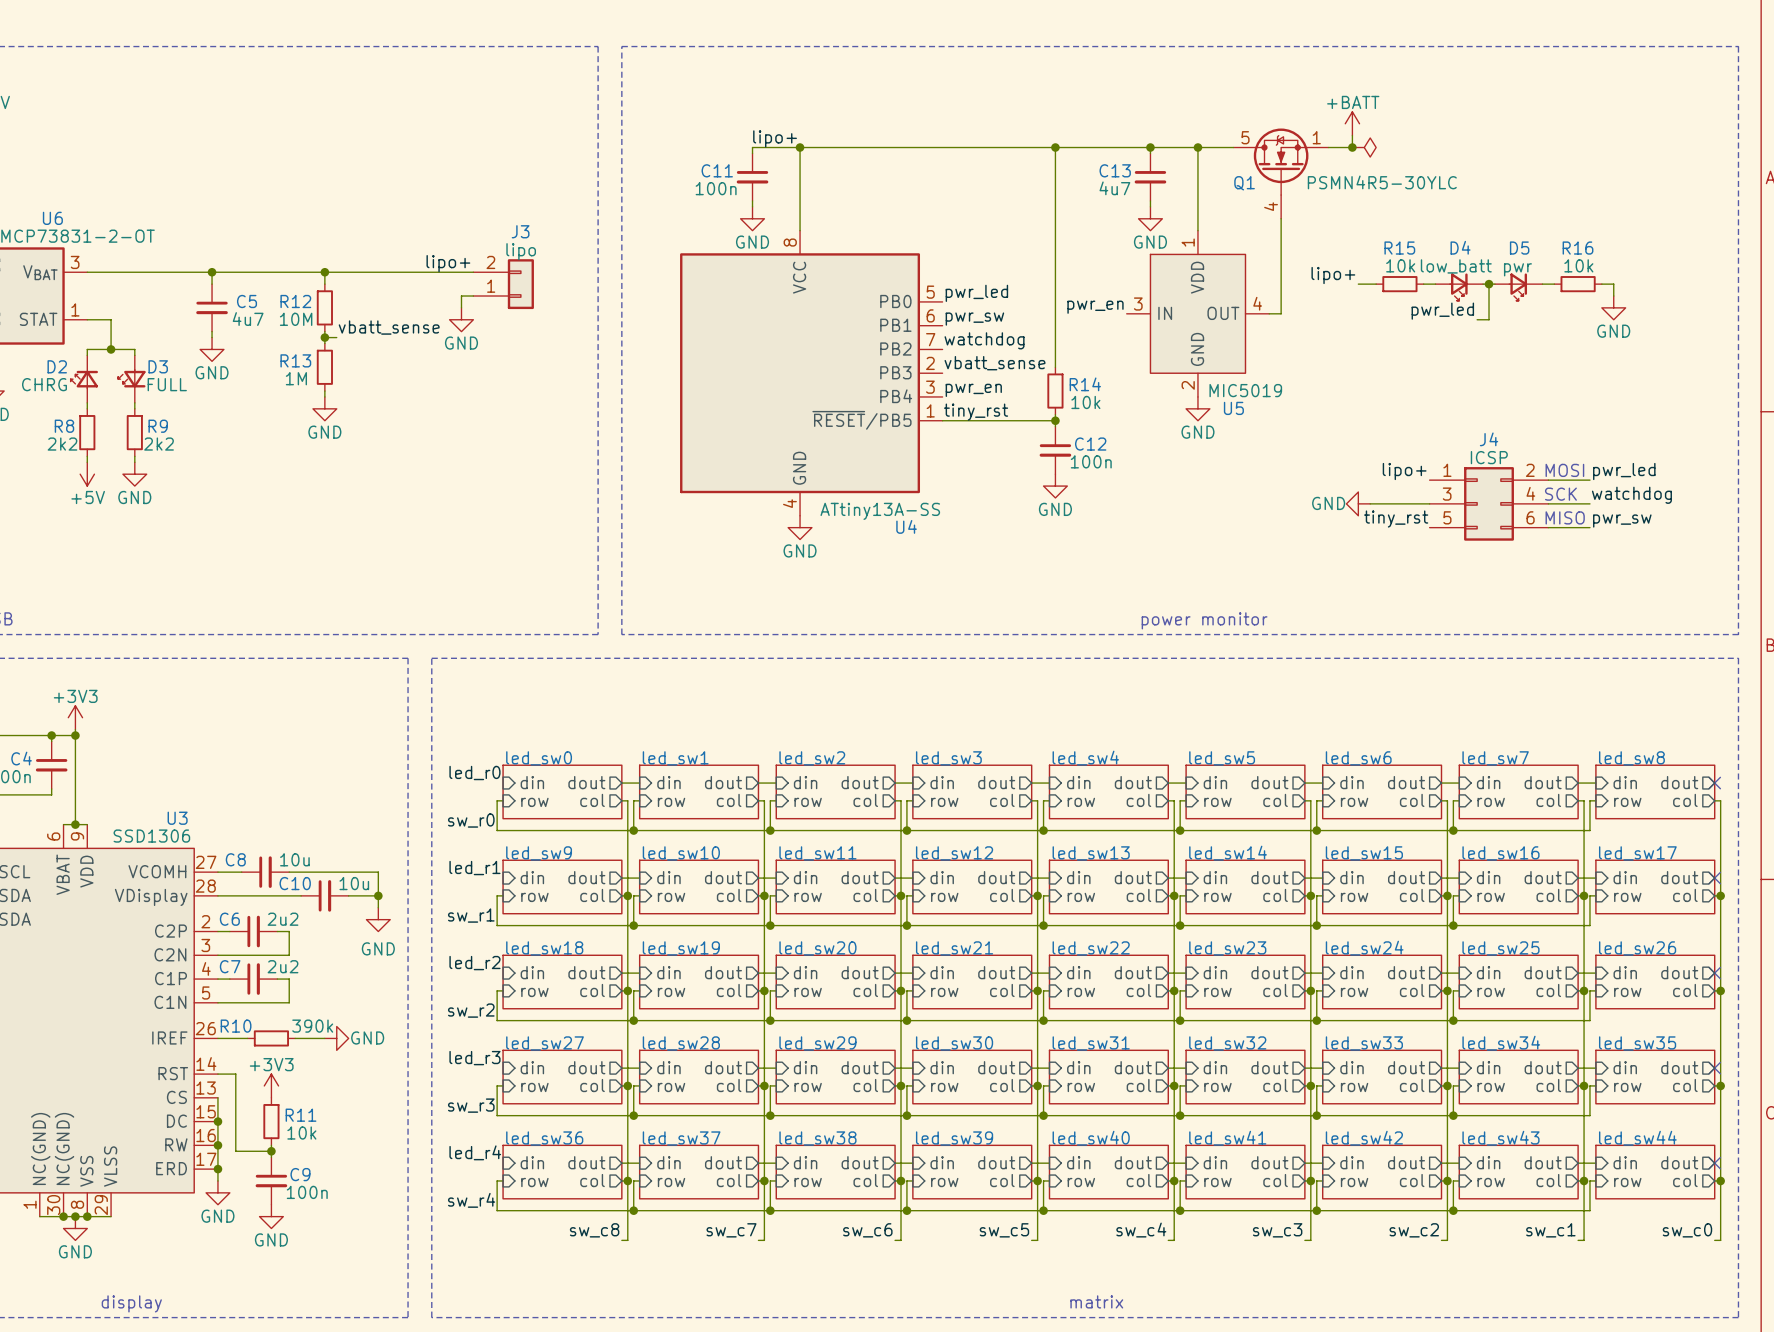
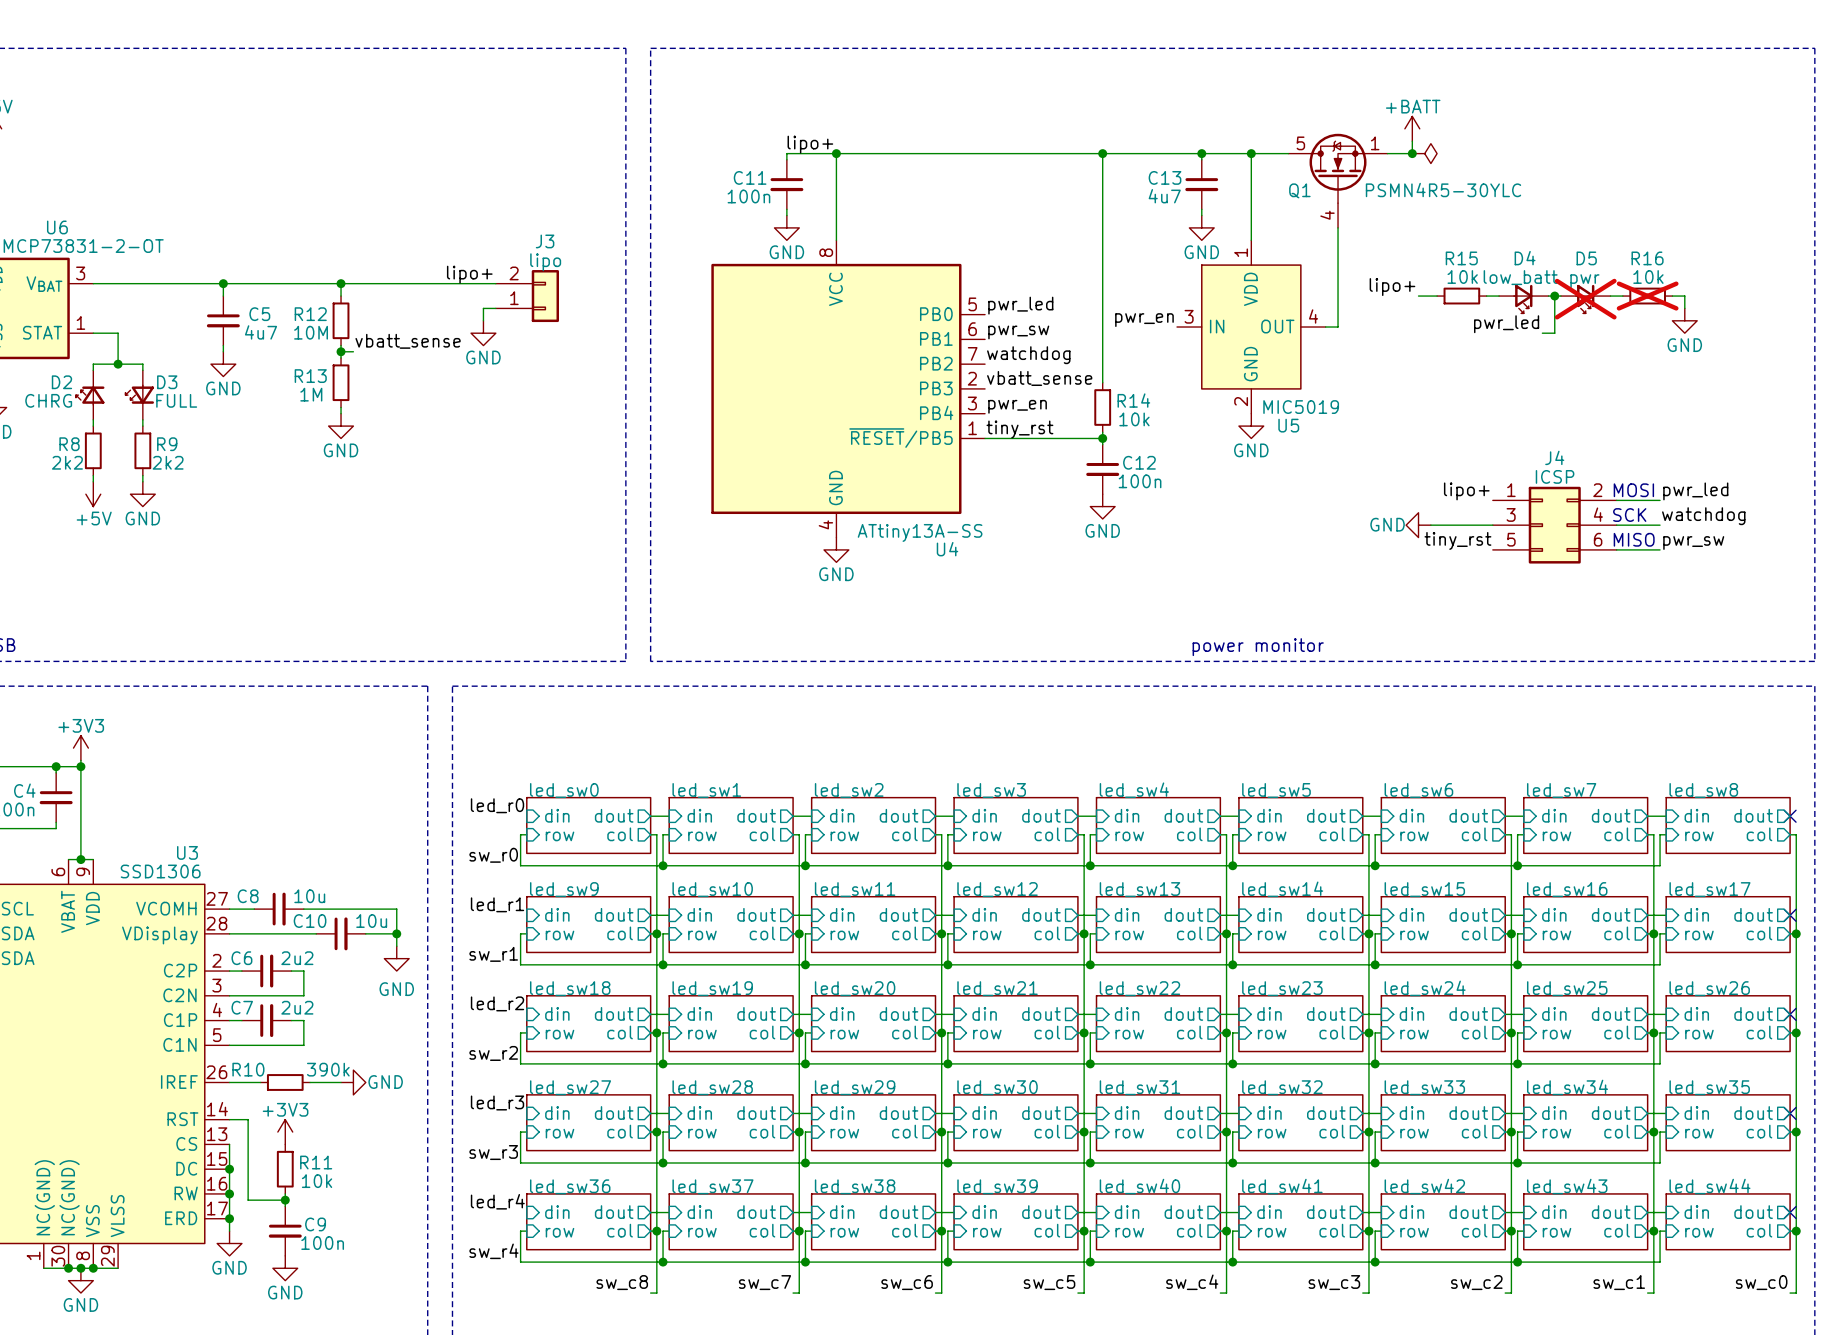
R16 do-not-place cross: none -> (1647, 296)
D5 do-not-place cross: none -> (1585, 299)

